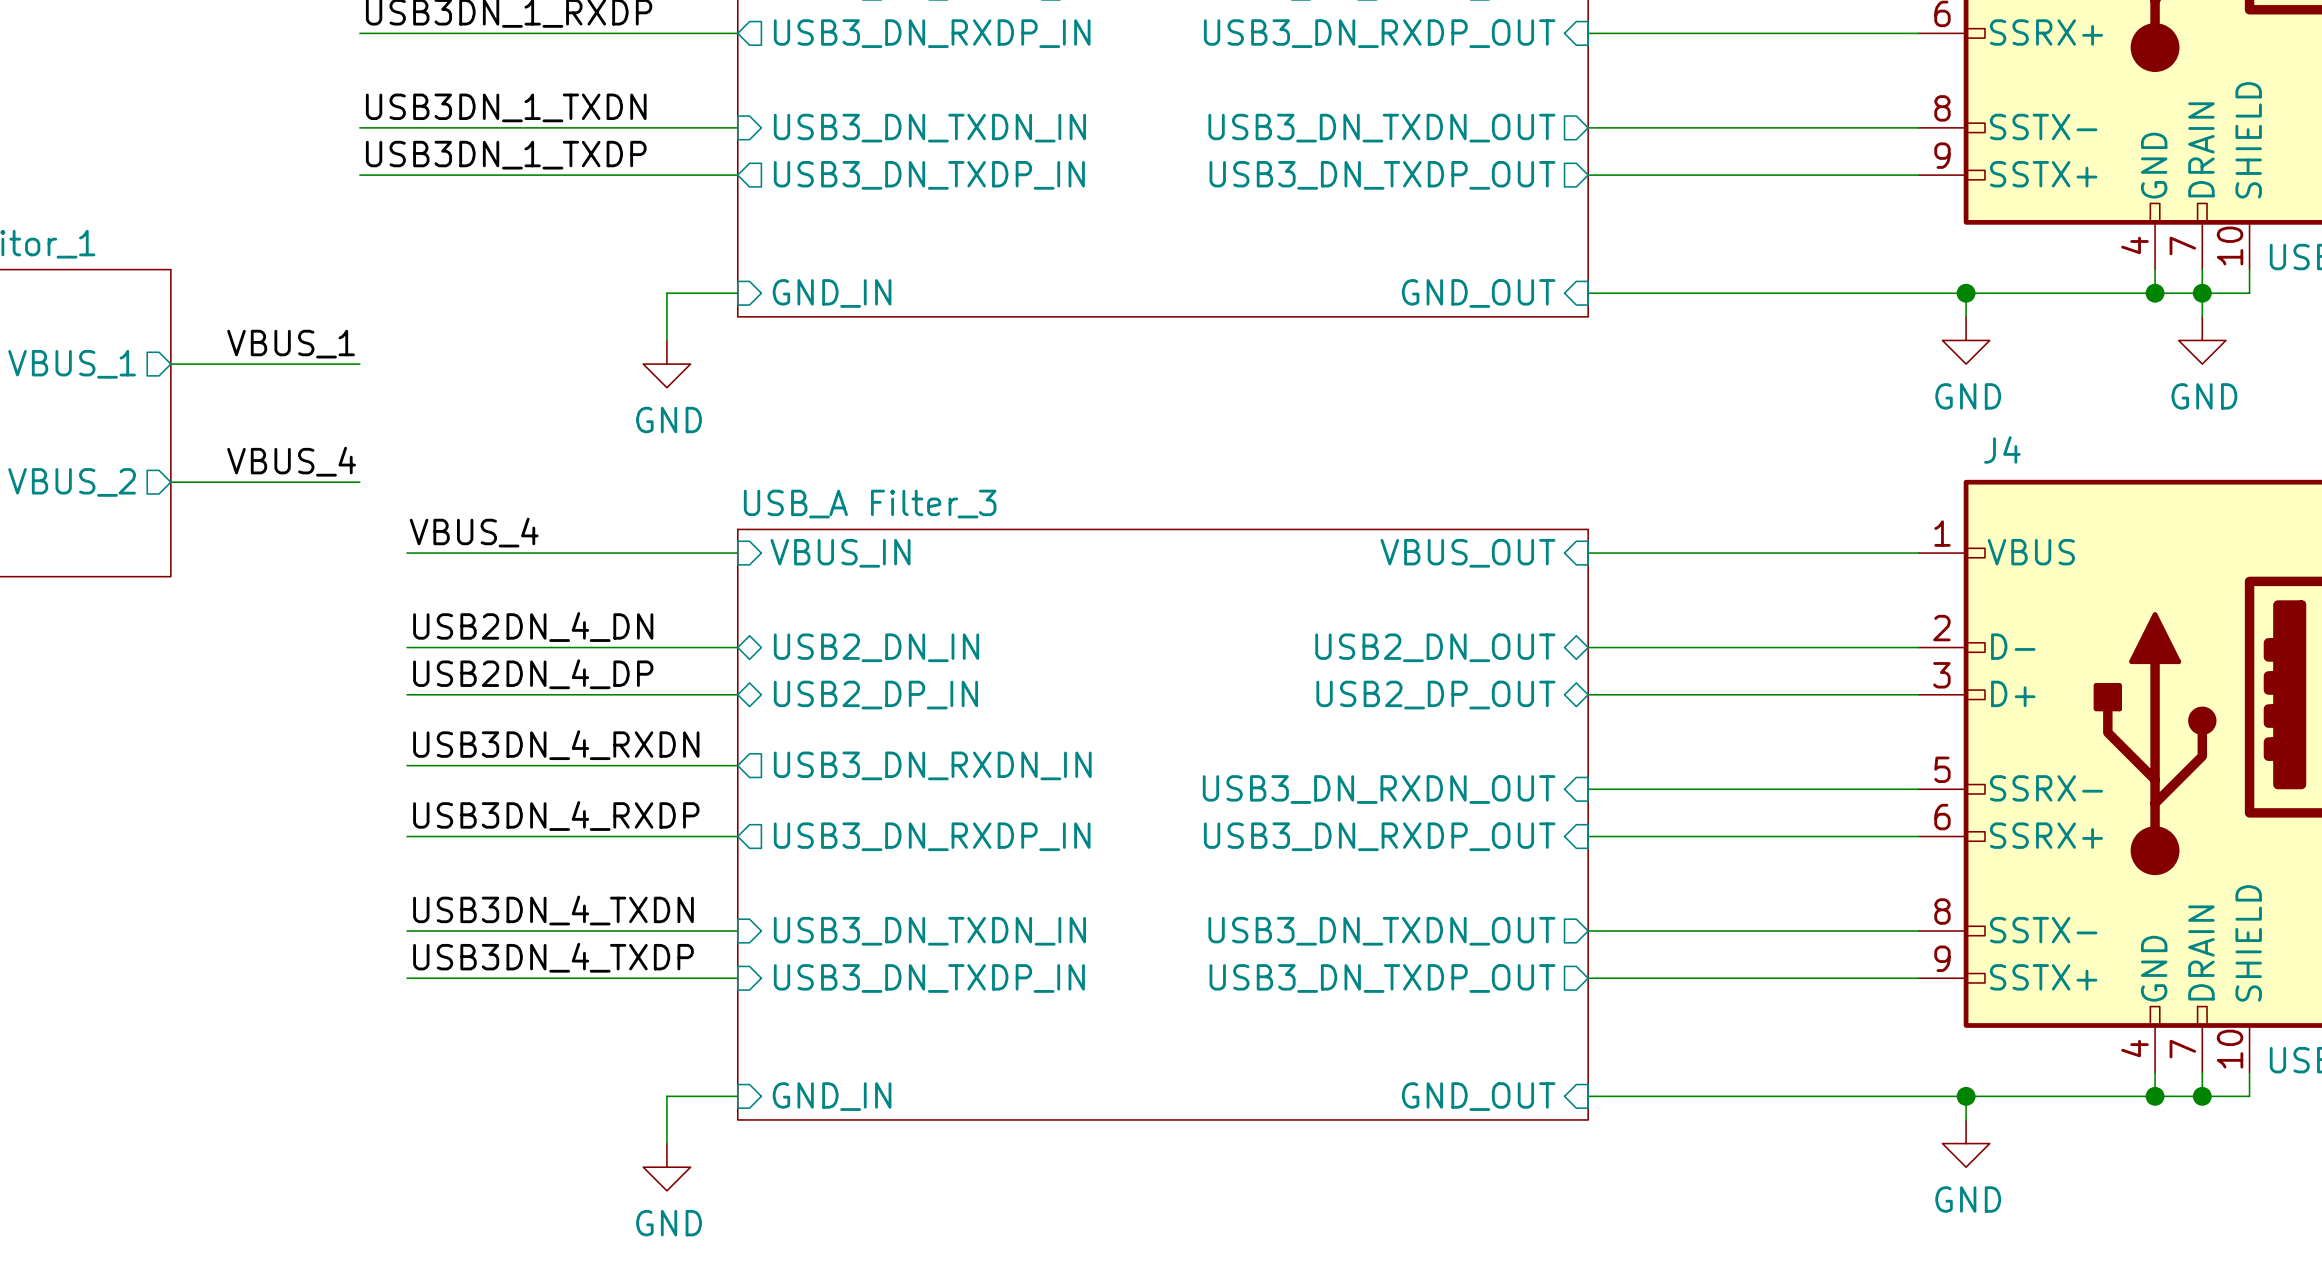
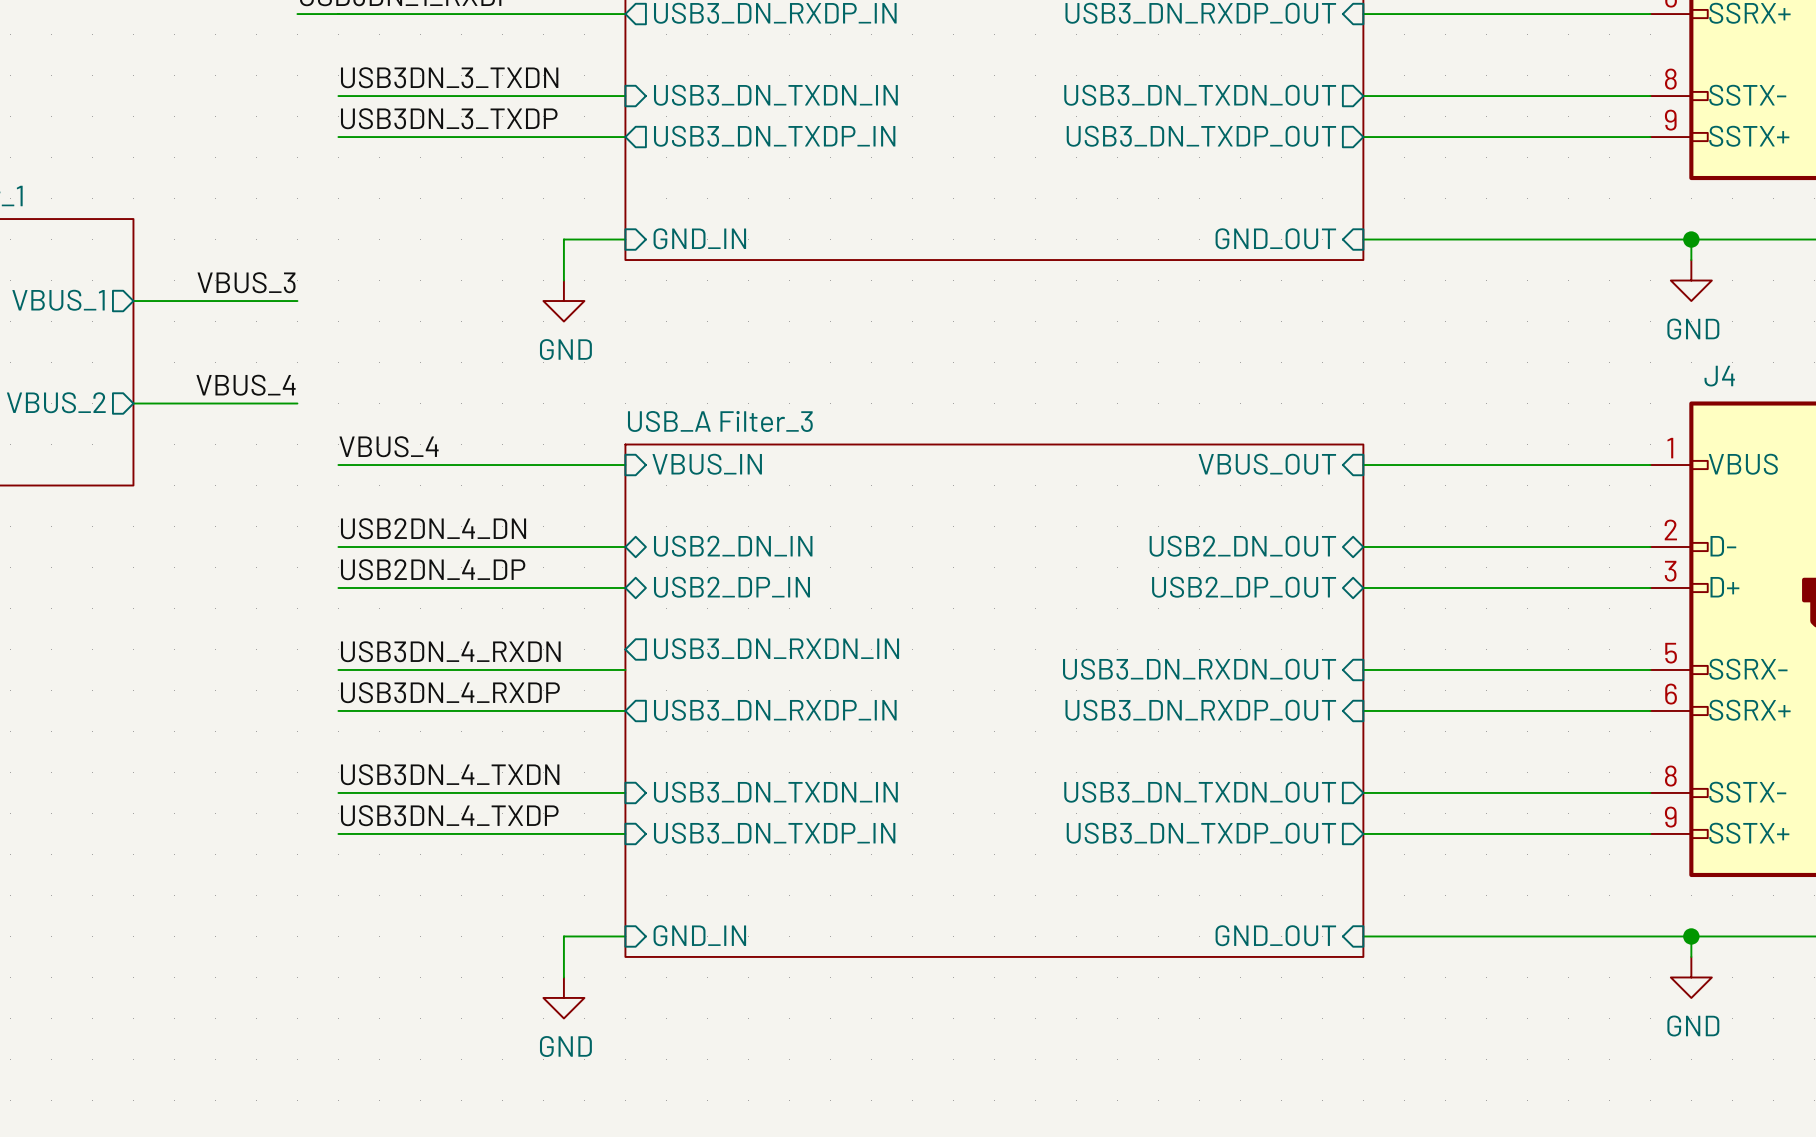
label: USB3DN_1_TXDN (506, 107) -> none
label: none -> USB3DN_3_TXDN (449, 77)
wire: (359, 127) (407, 127) -> none
label: USB3DN_1_TXDP (506, 155) -> none
label: none -> USB3DN_3_TXDP (449, 118)
wire: (359, 175) (407, 175) -> none
label: VBUS_1 (291, 344) -> VBUS_3 (246, 282)
label position: USB3DN_4_RXDN (556, 745) -> USB3DN_4_RXDN (450, 651)
wire: (407, 765) (737, 765) -> (338, 669) (625, 669)

